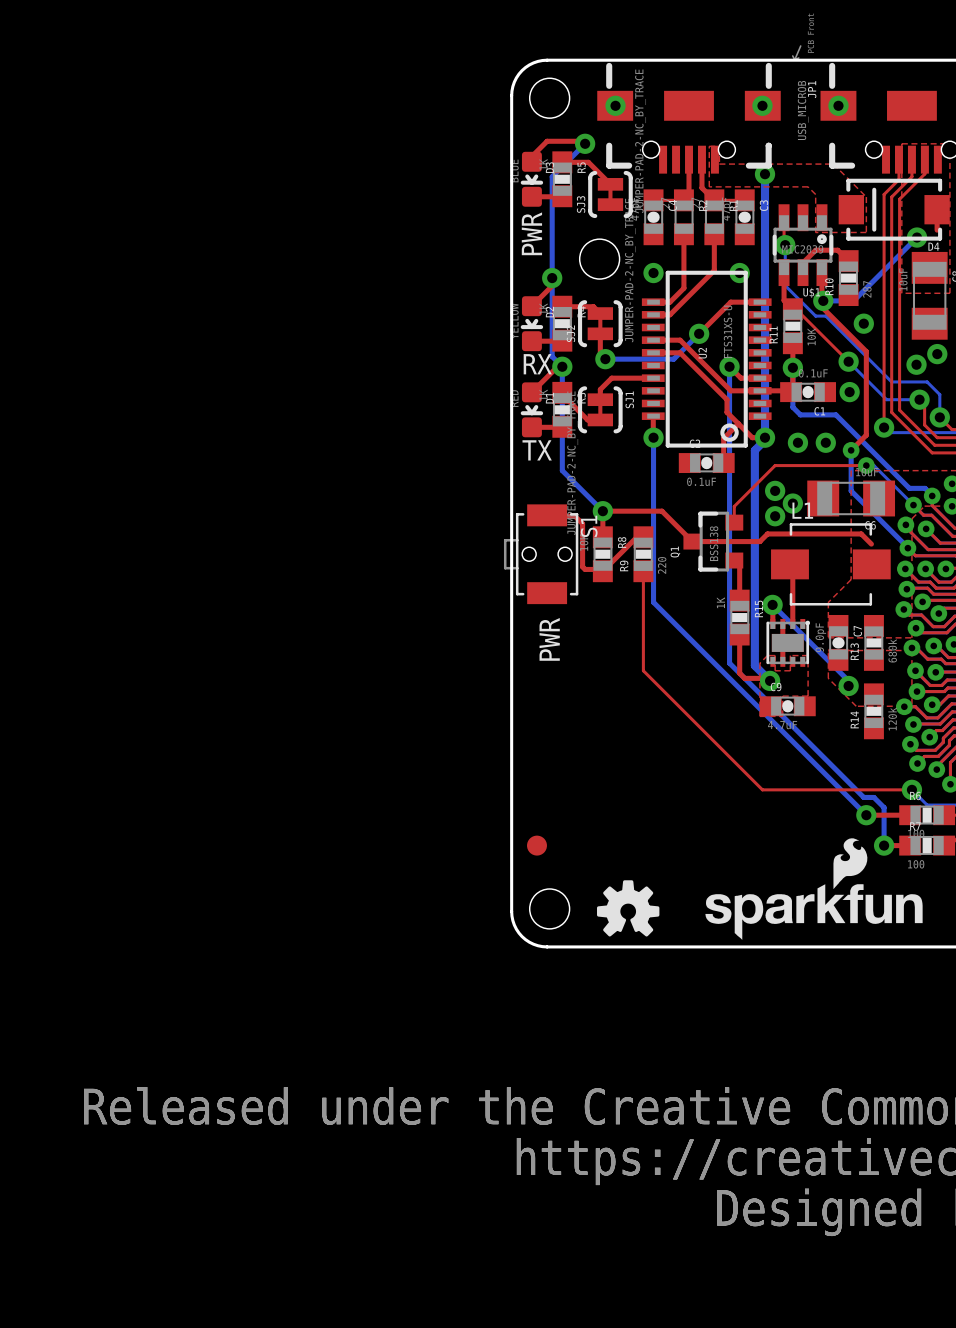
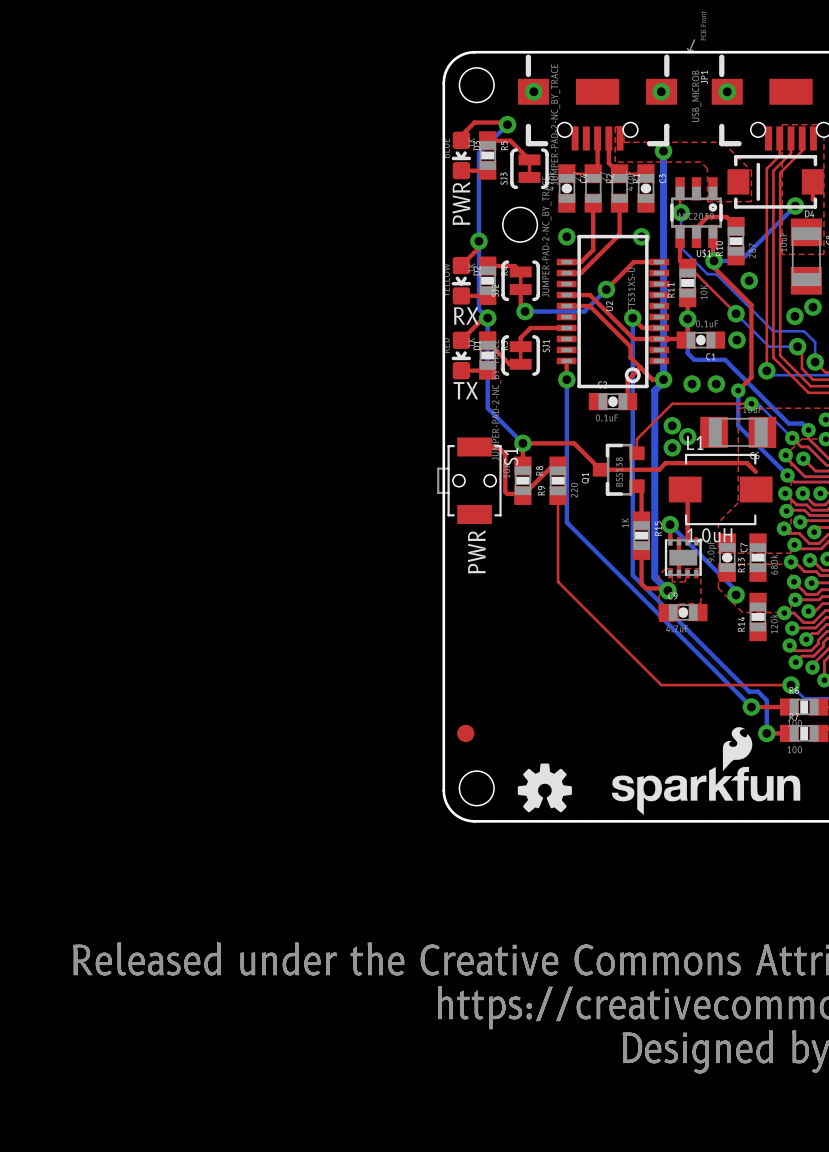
L1 value: none -> 1.0uH (709, 535)

